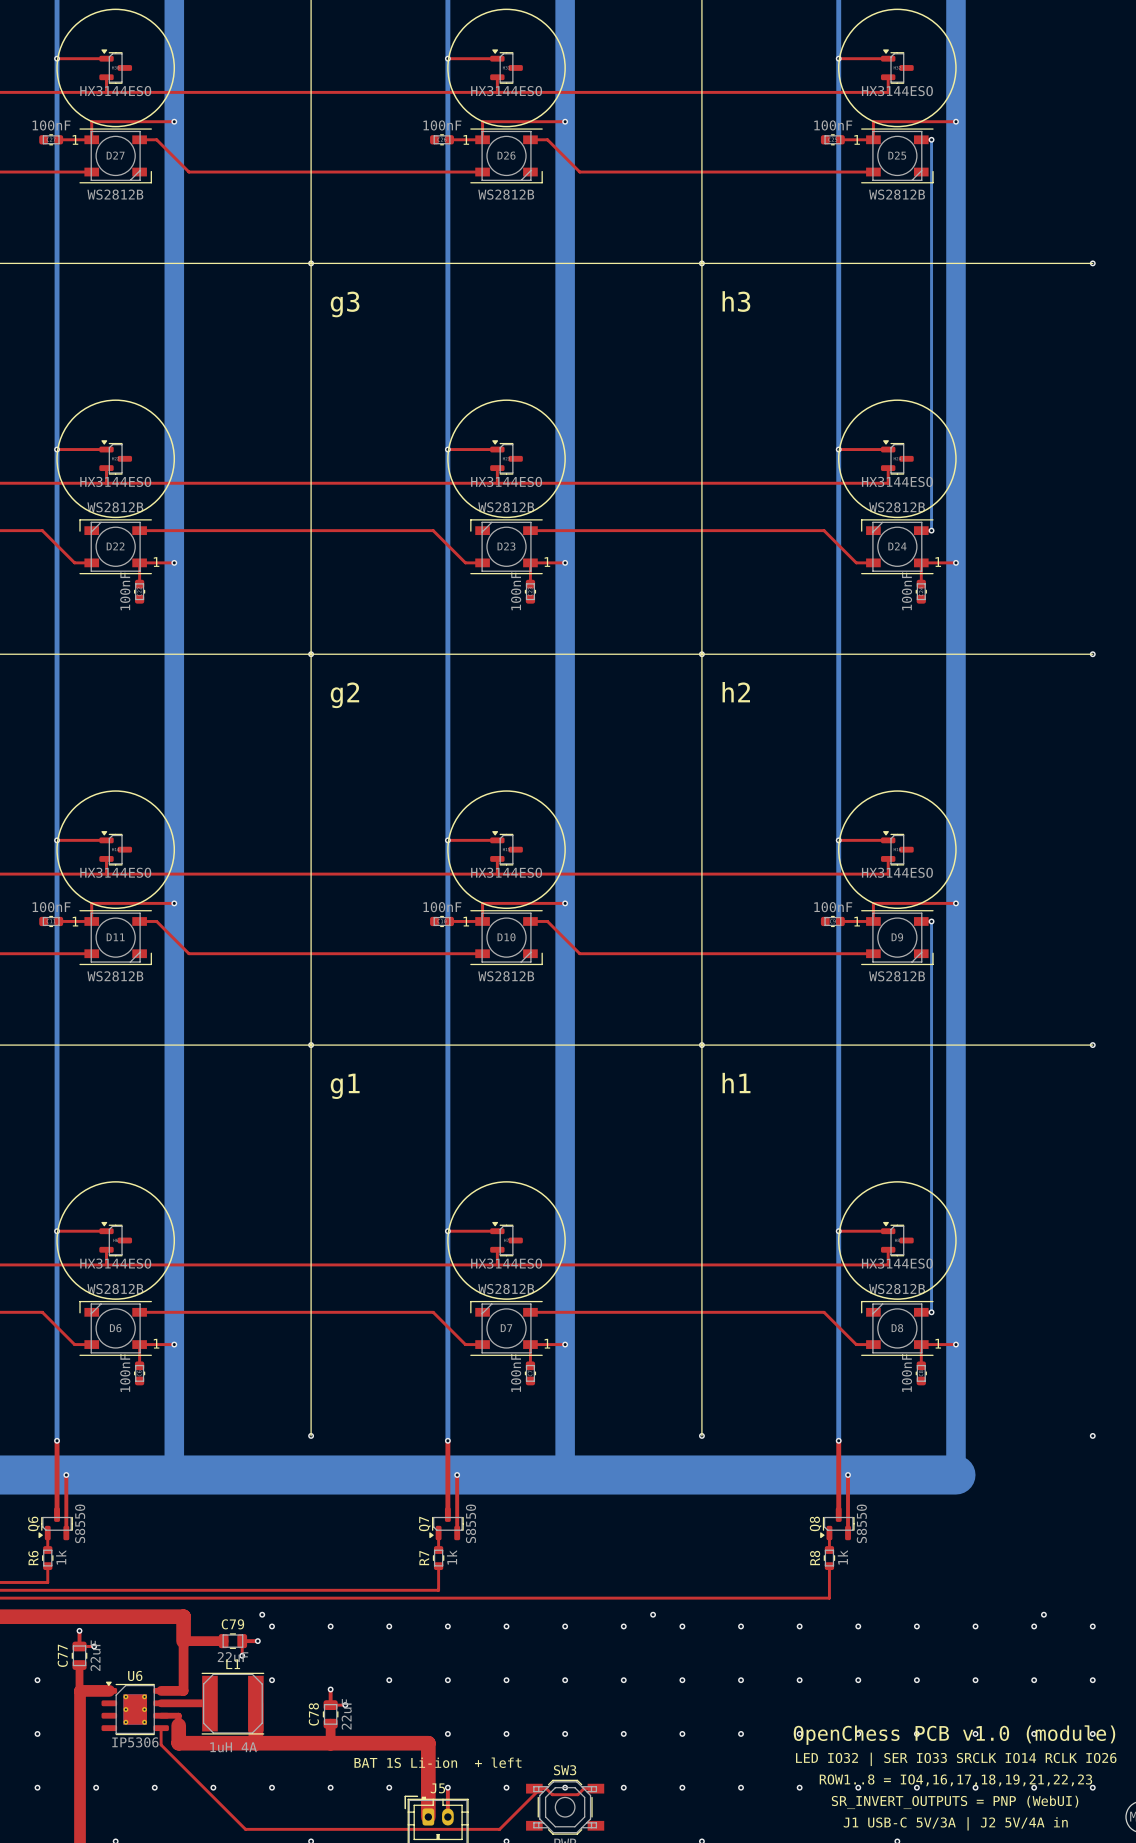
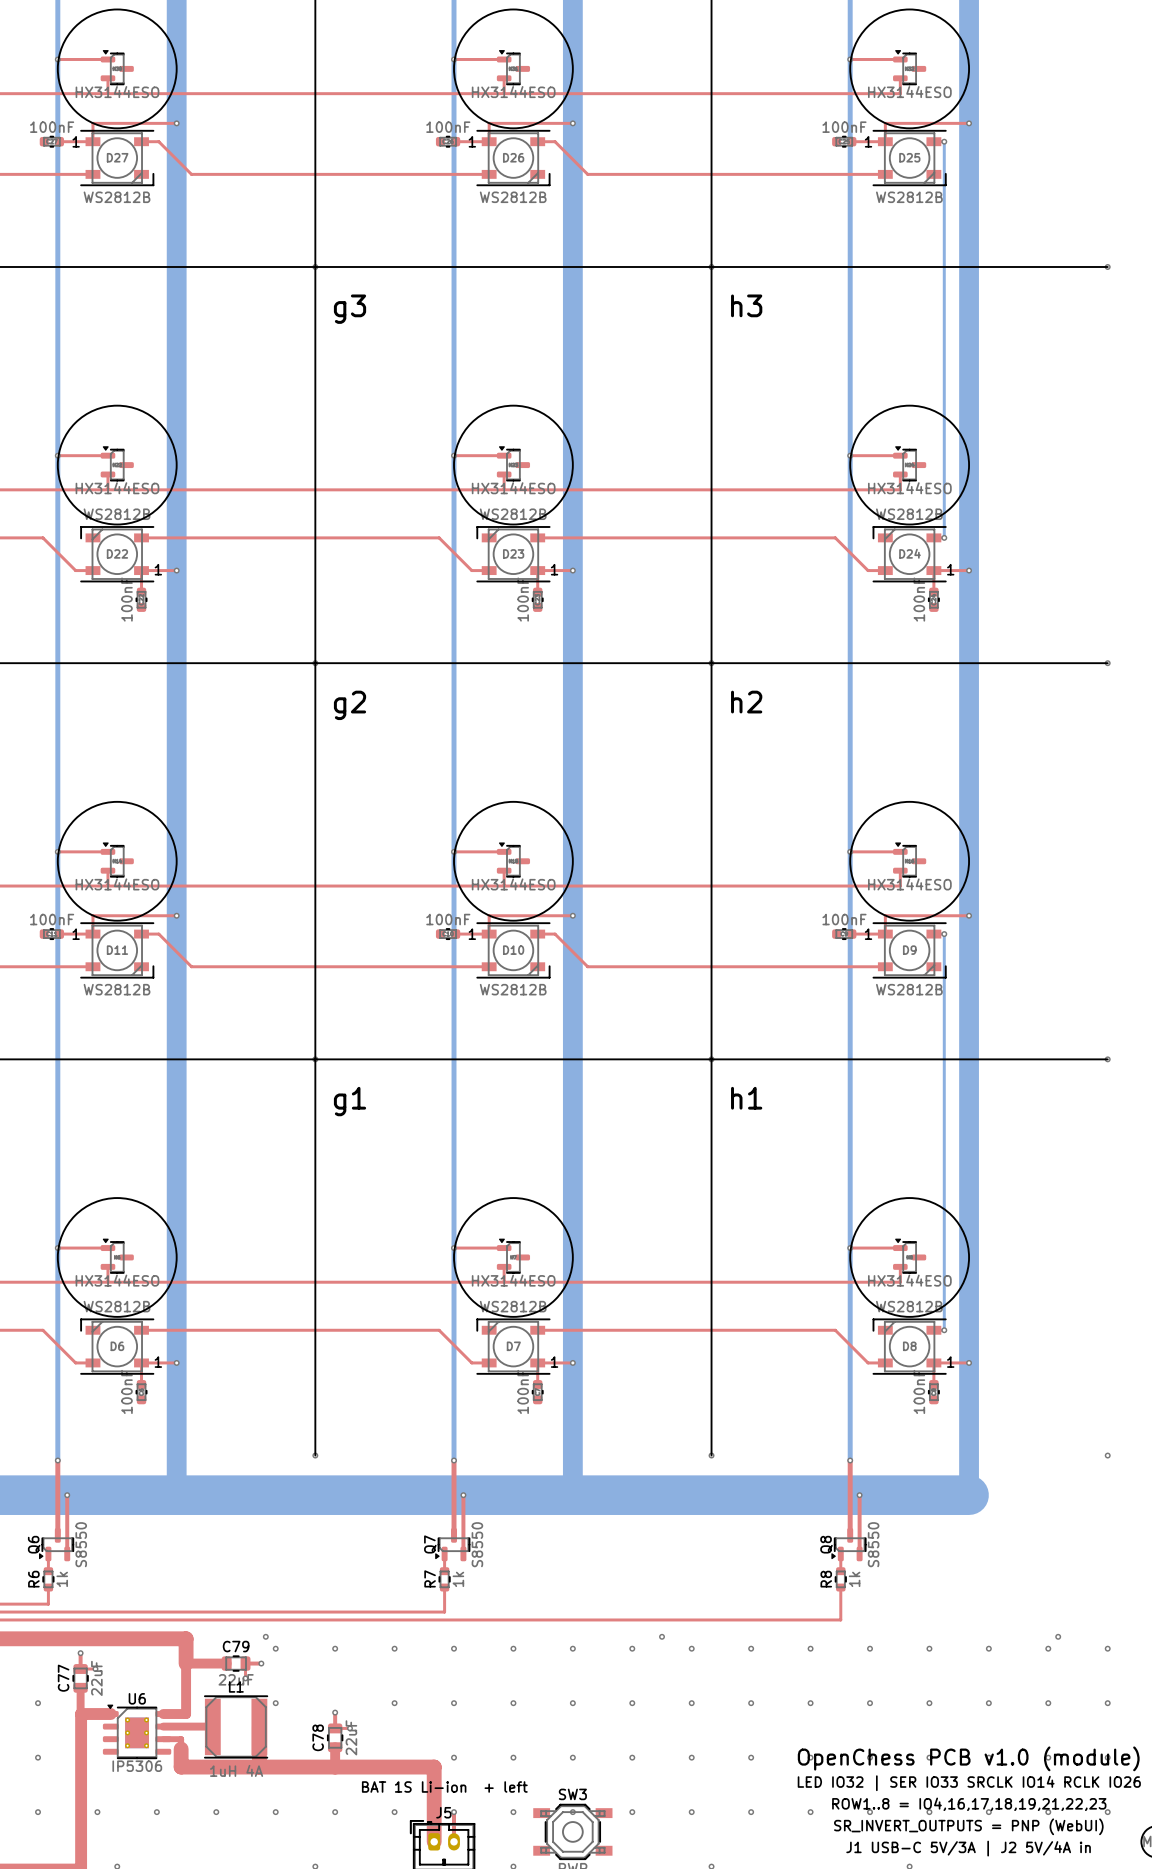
top track: (161, 1728) (161, 1744) (245, 1829) (499, 1829) (540, 1788) -> none
top track: (534, 1788) (546, 1788) (552, 1794) (577, 1794) (583, 1788) (595, 1788) -> none

